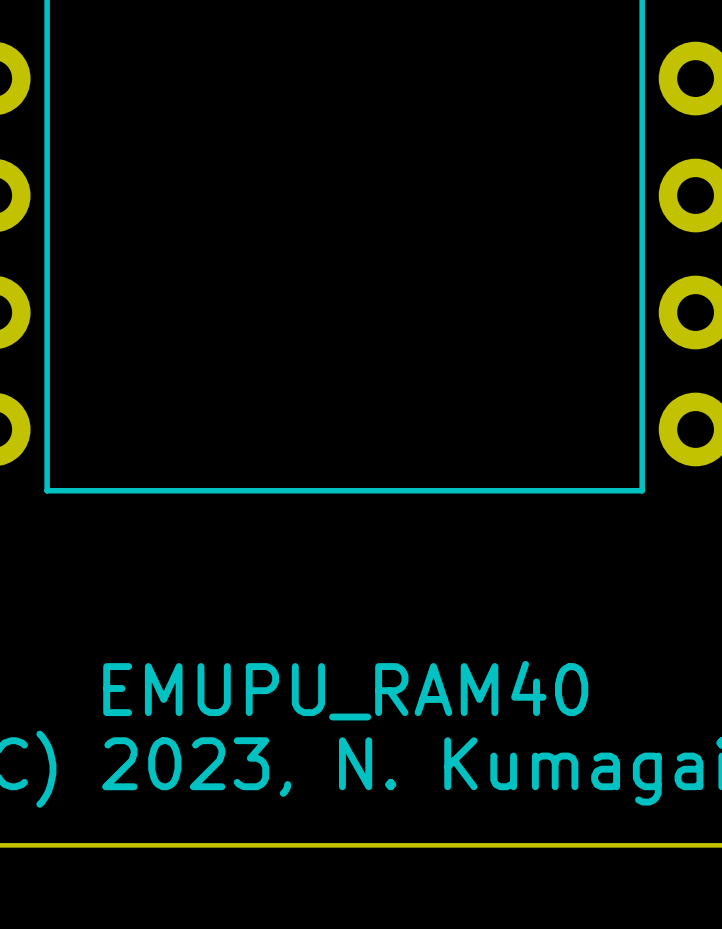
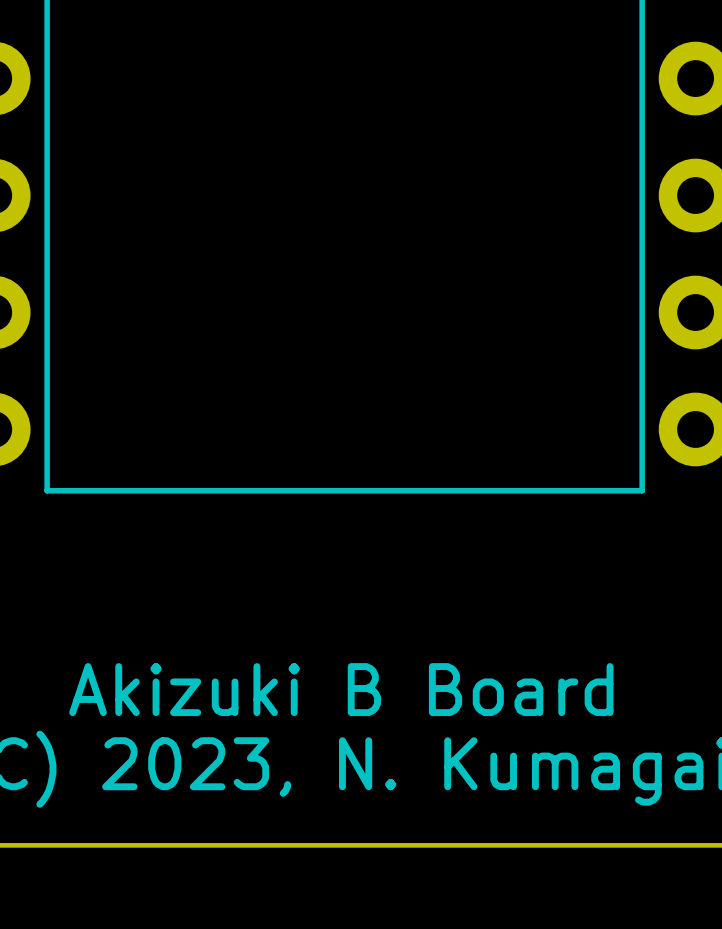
text: EMUPU_RAM40 (345, 690) -> Akizuki B Board (341, 689)

